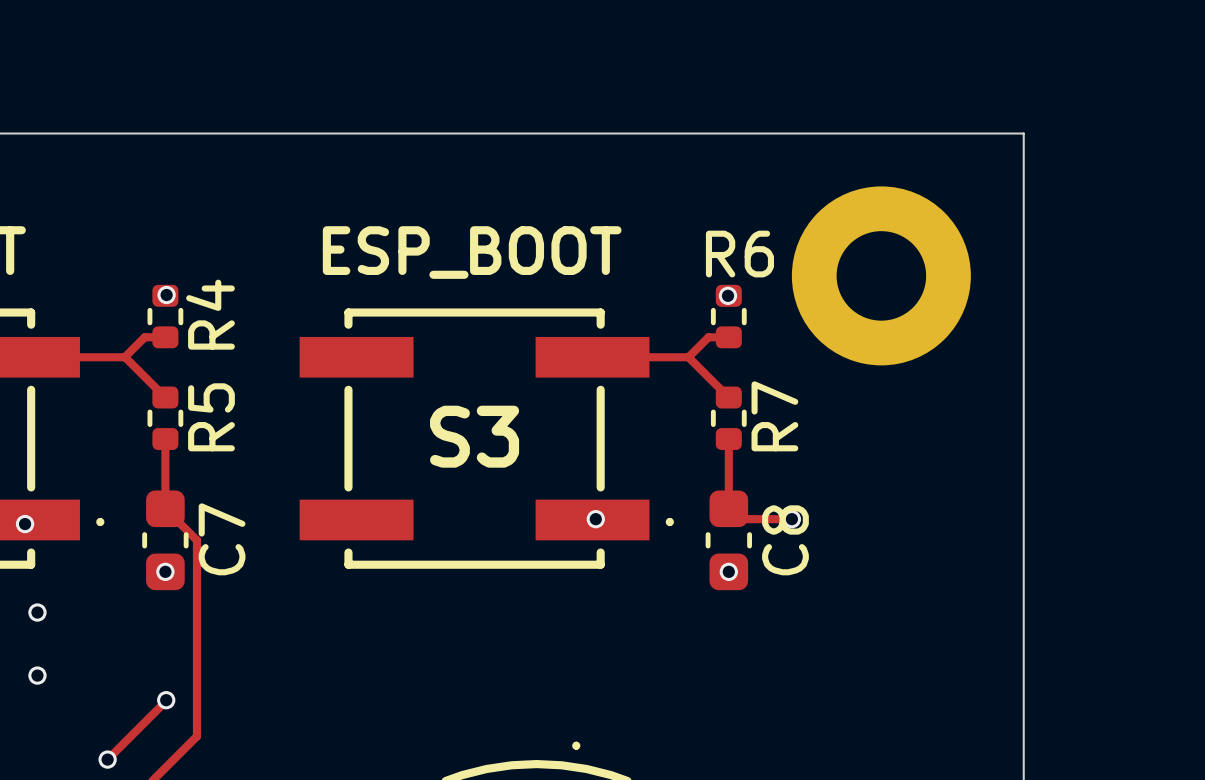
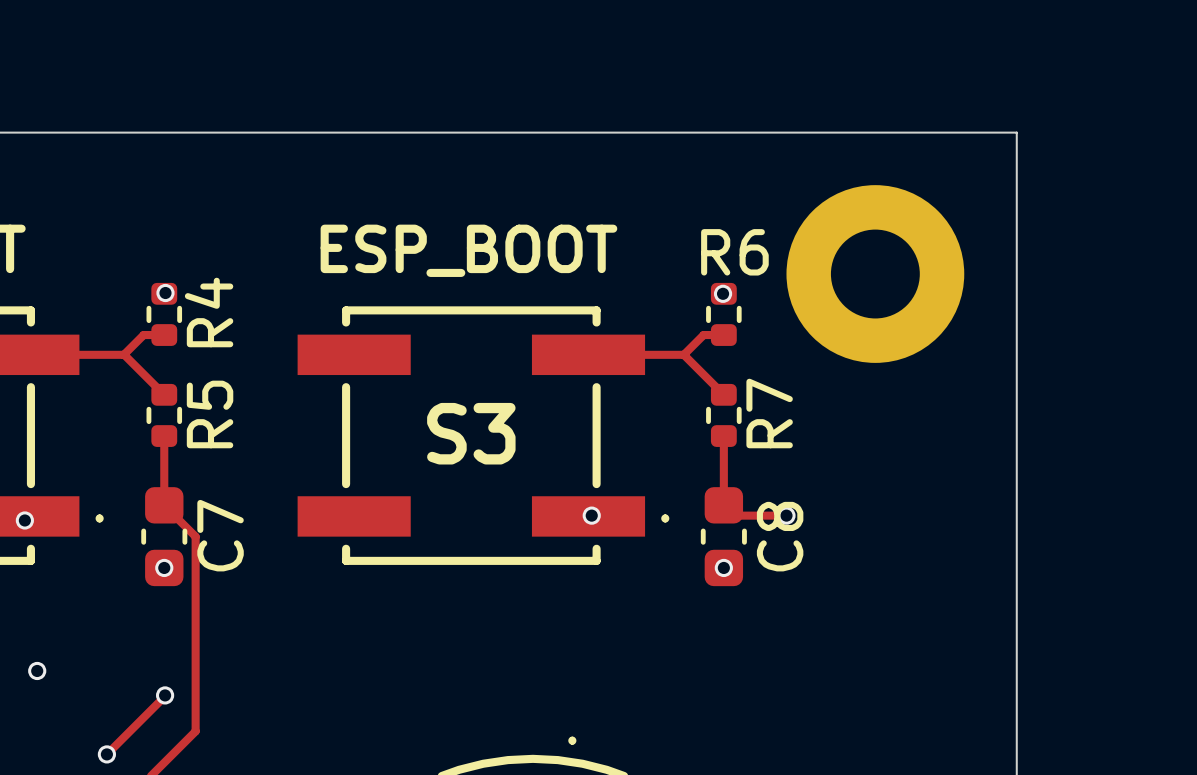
via: (37, 612) -> none

